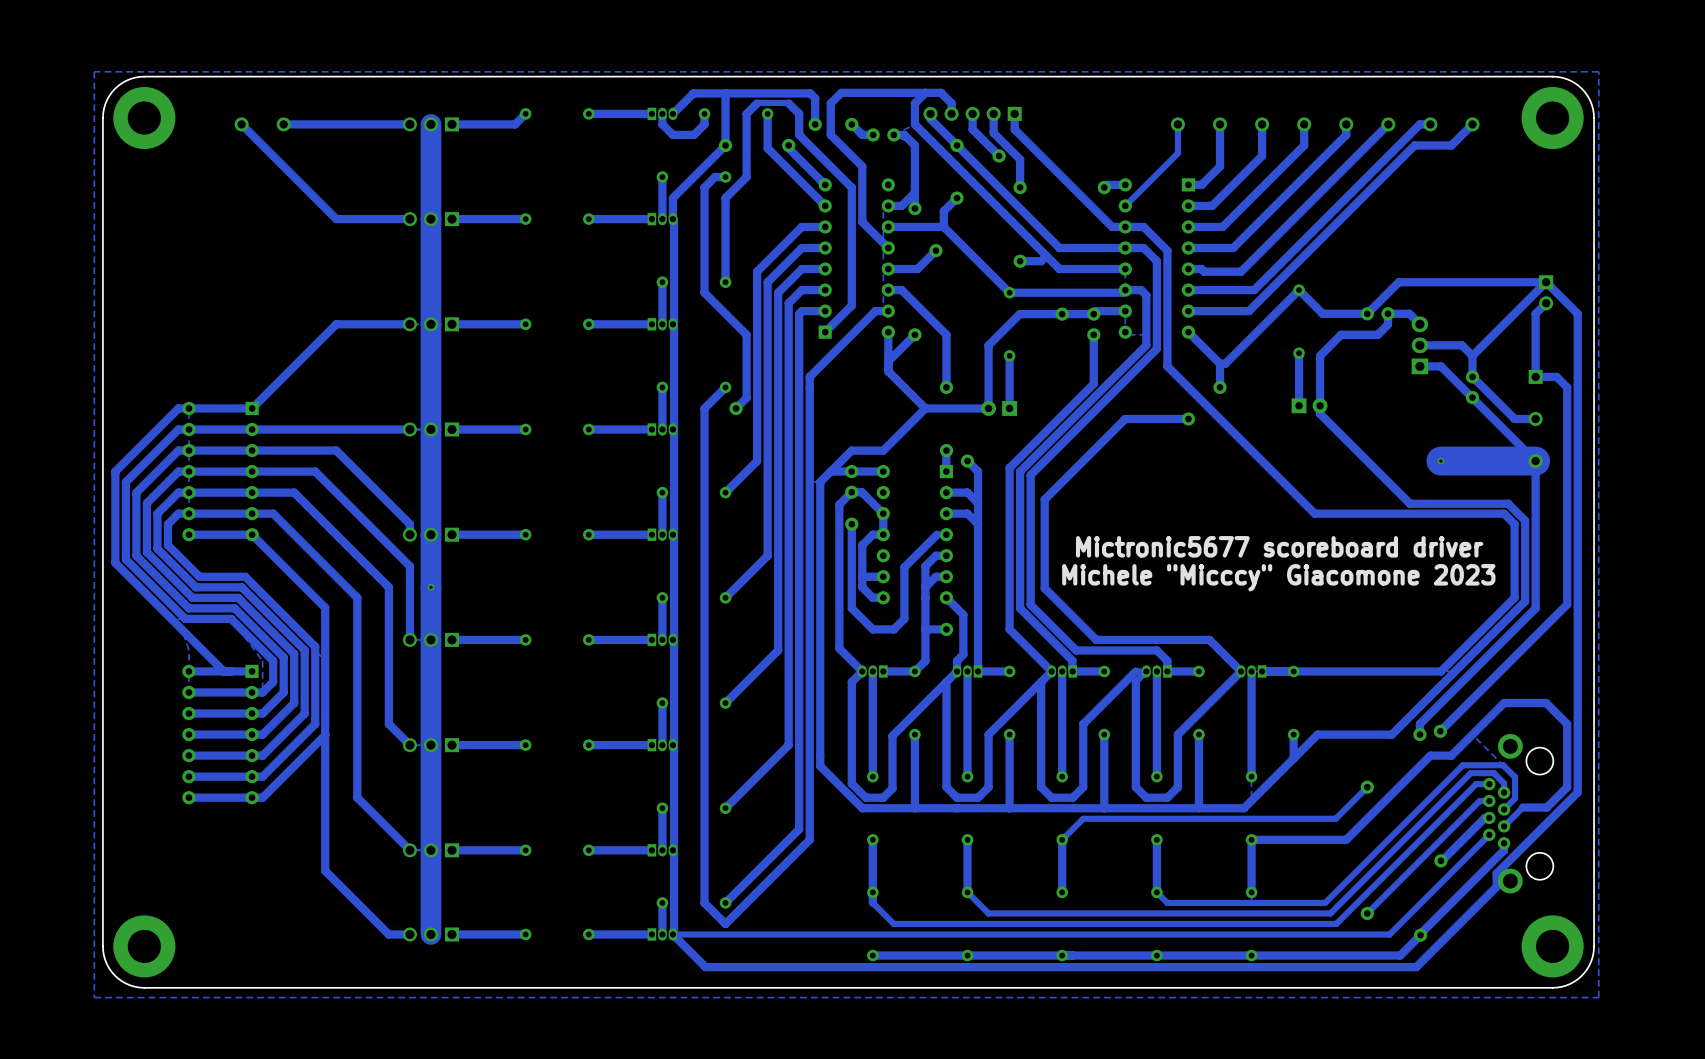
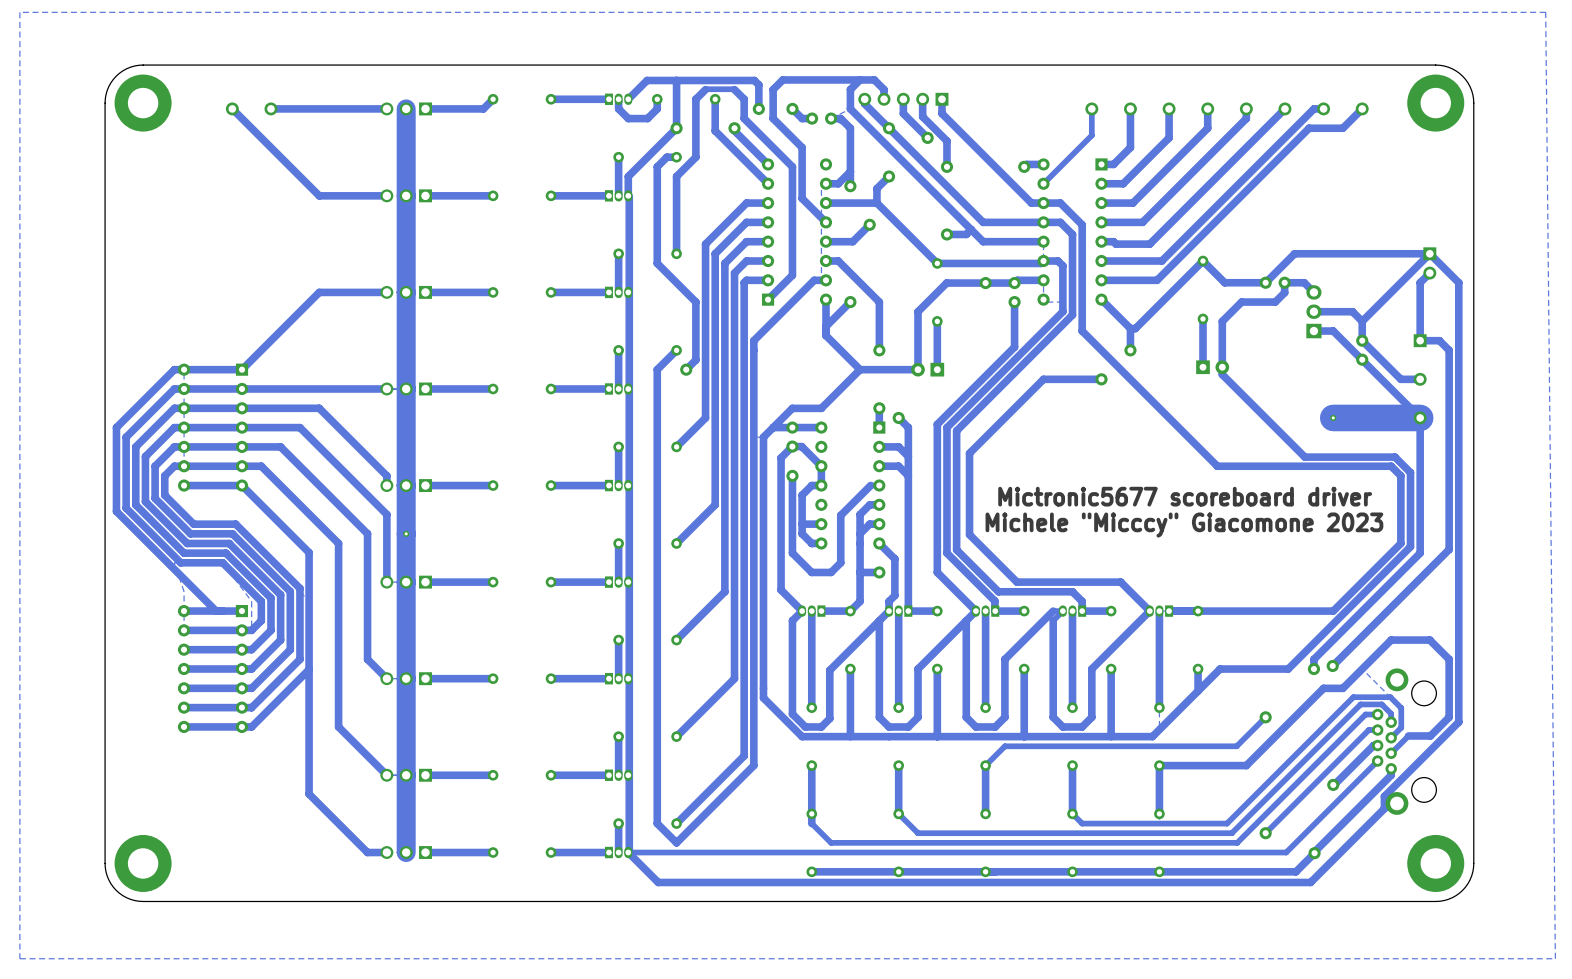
zone outline: (1598, 71) (94, 71) (94, 997) (1598, 997) (1598, 71) -> (1545, 12) (1555, 958) (19, 958) (19, 12) (1545, 12)

